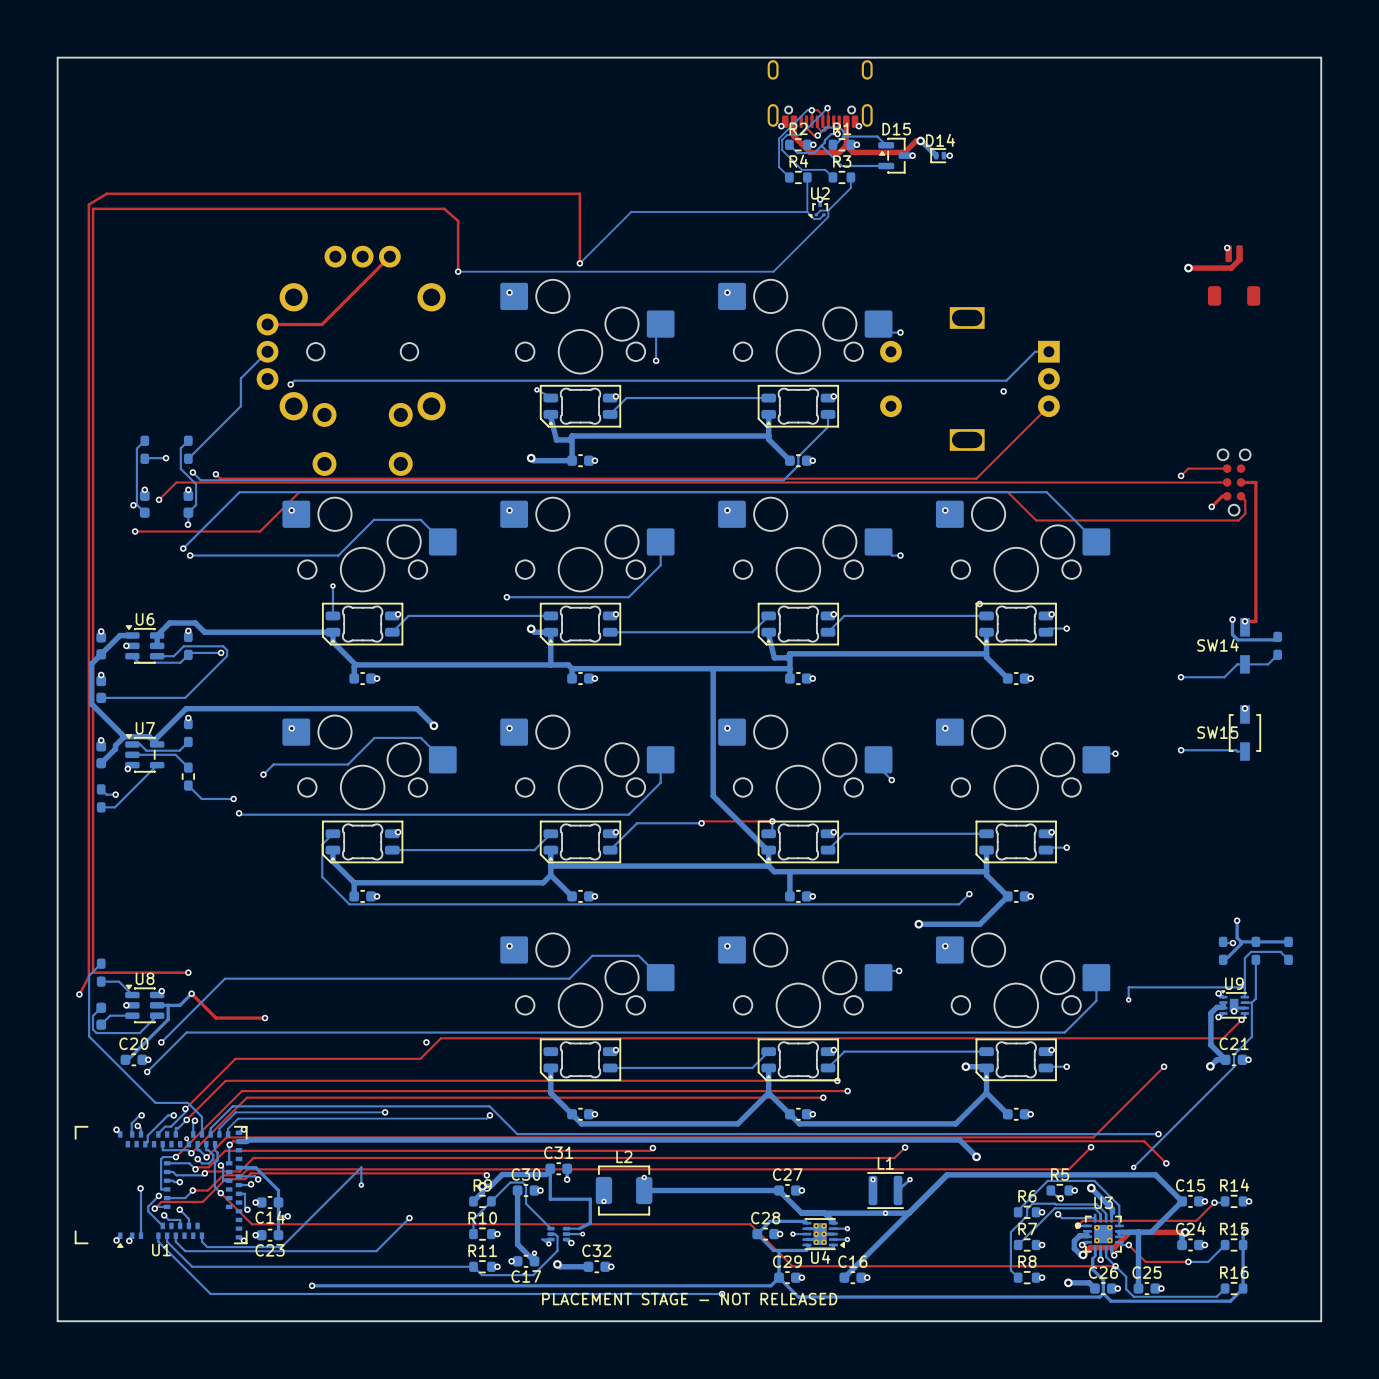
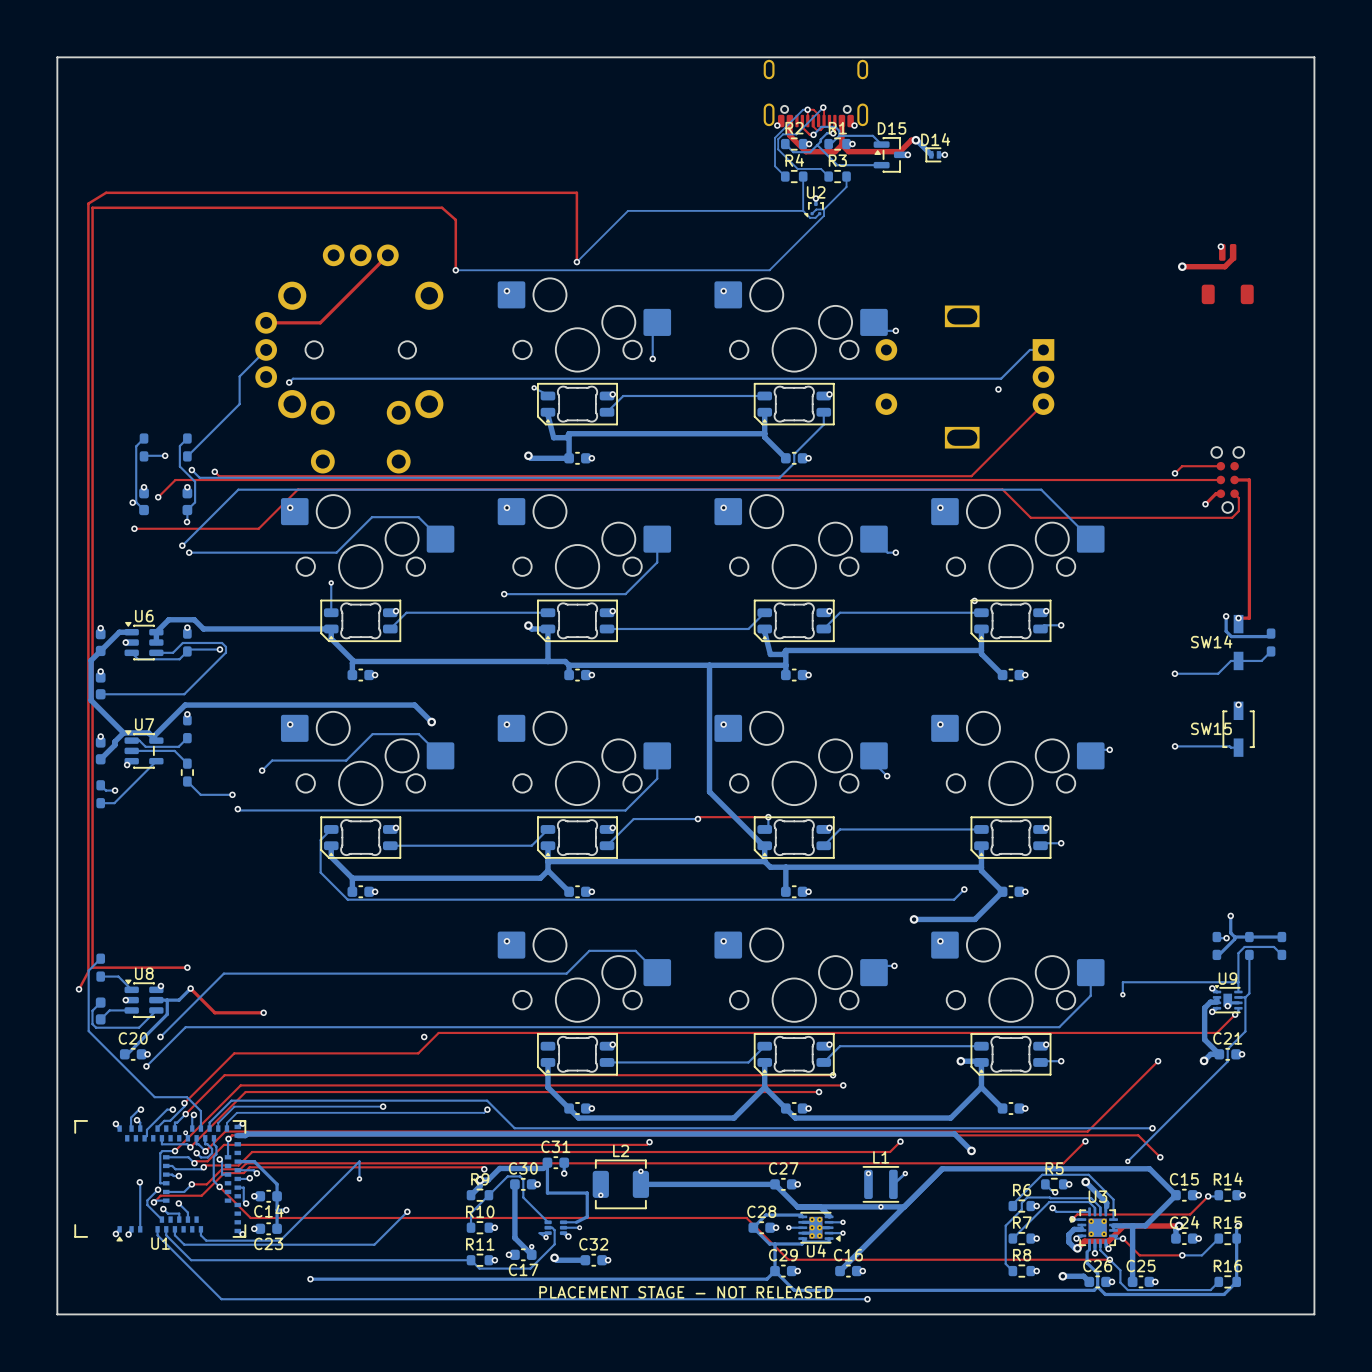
bottom track: (722, 1294) (210, 1294) -> (867, 1299) (221, 1299) (209, 1287)
via: (722, 1294) -> none
via: none -> (867, 1299)

